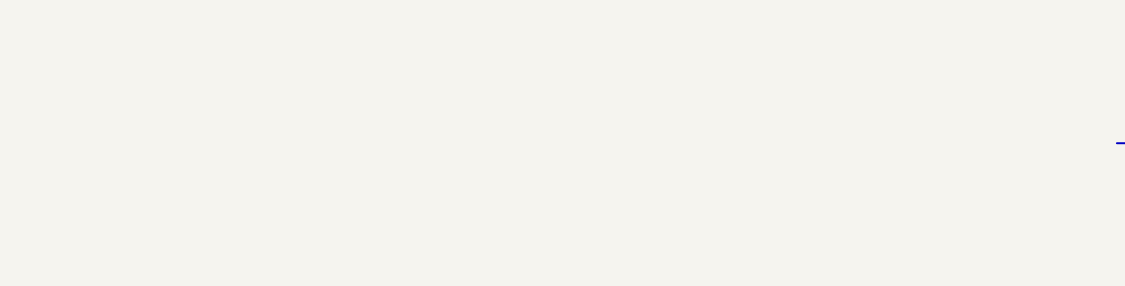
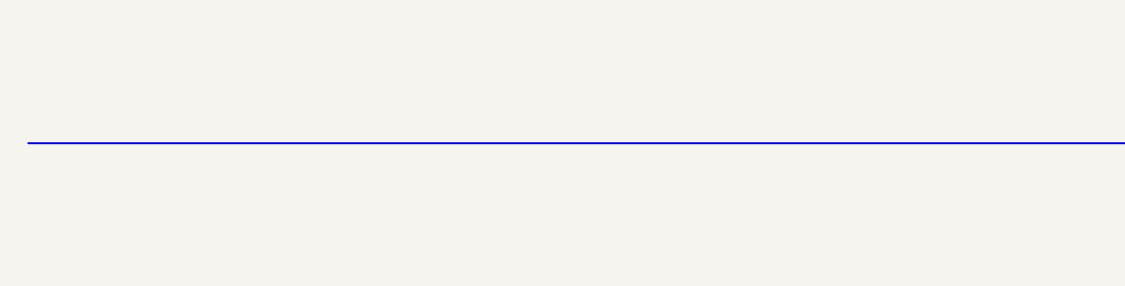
bus: none -> (28, 143) (1116, 143)

